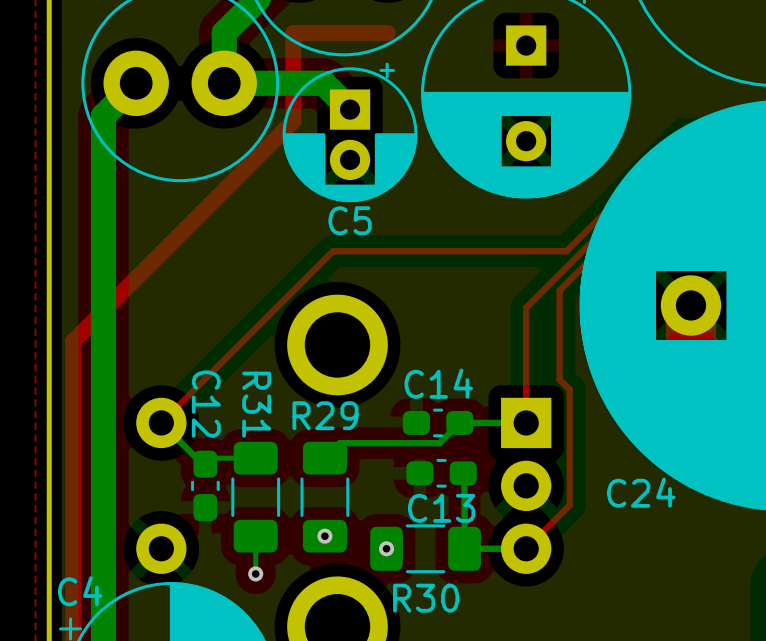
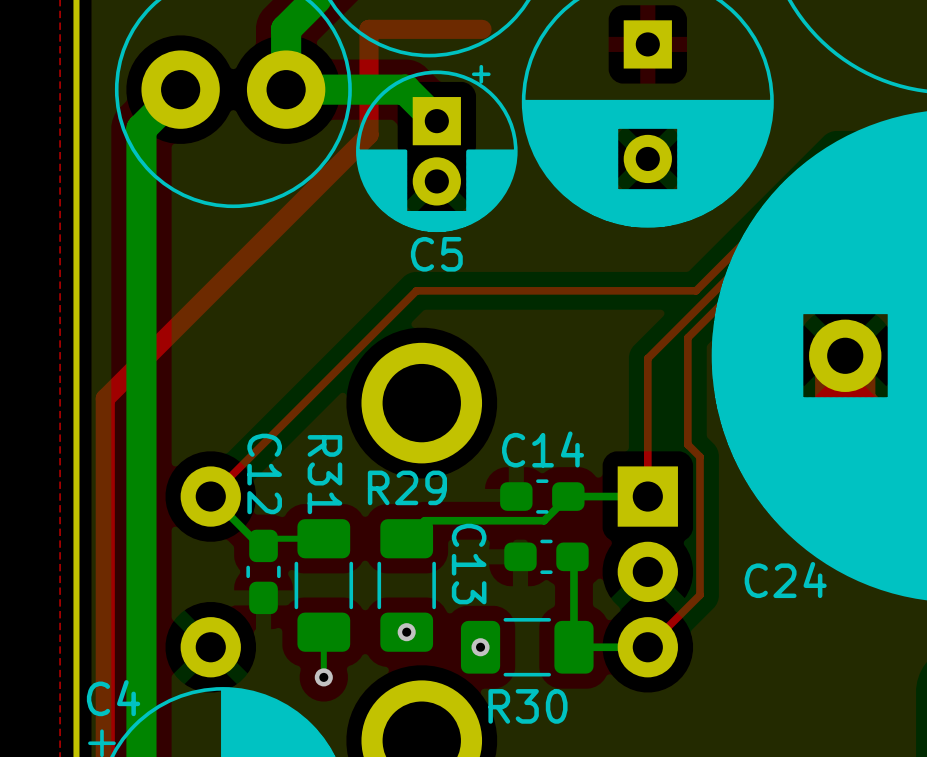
C13 name rotation: 0° (441, 508) -> 90° clockwise (469, 564)

